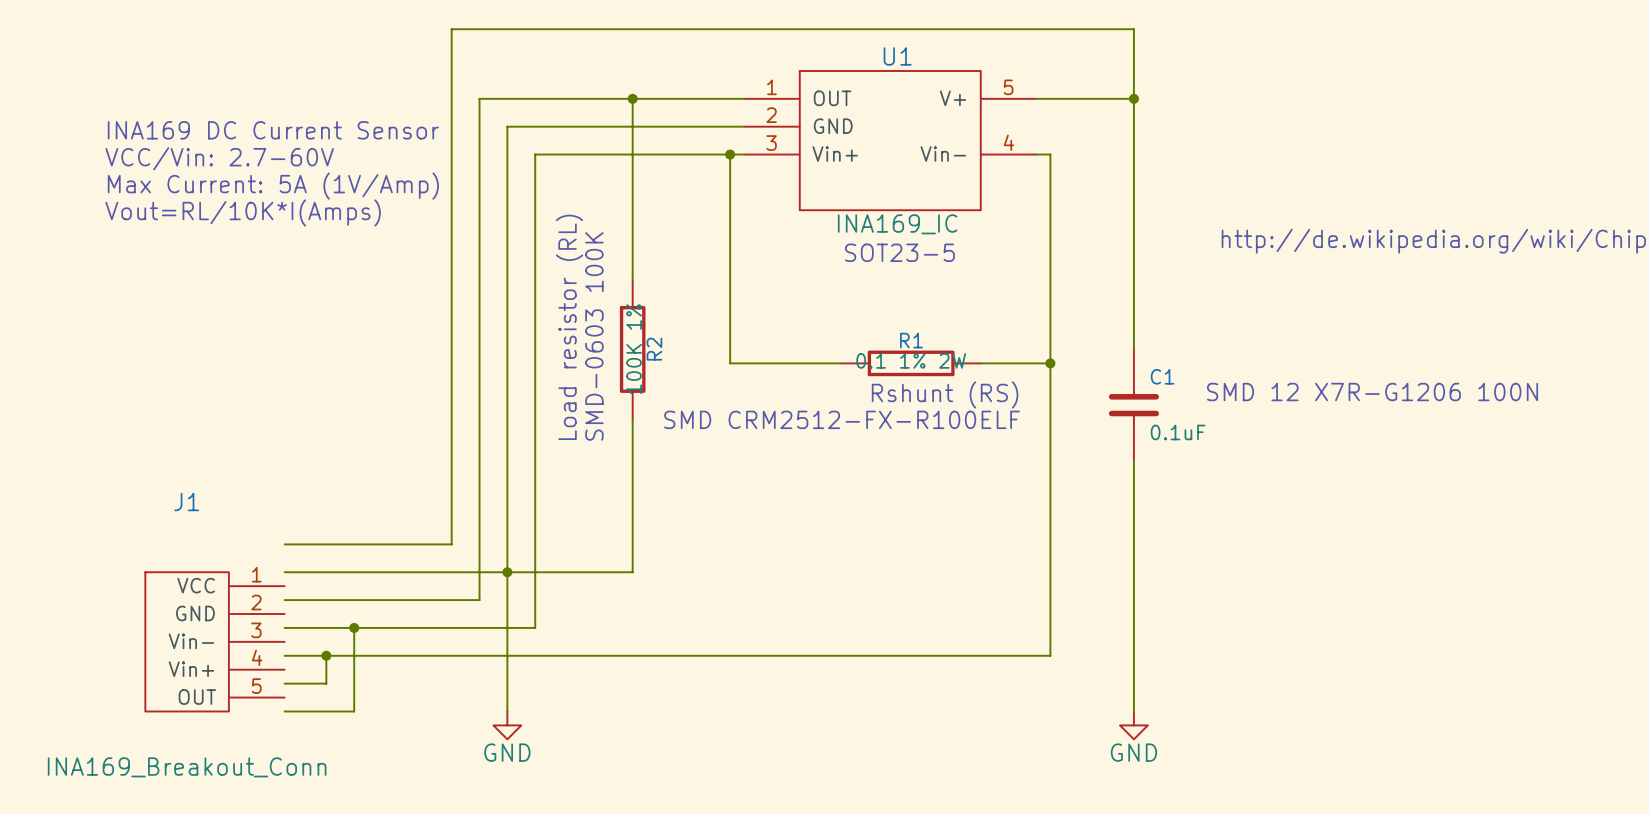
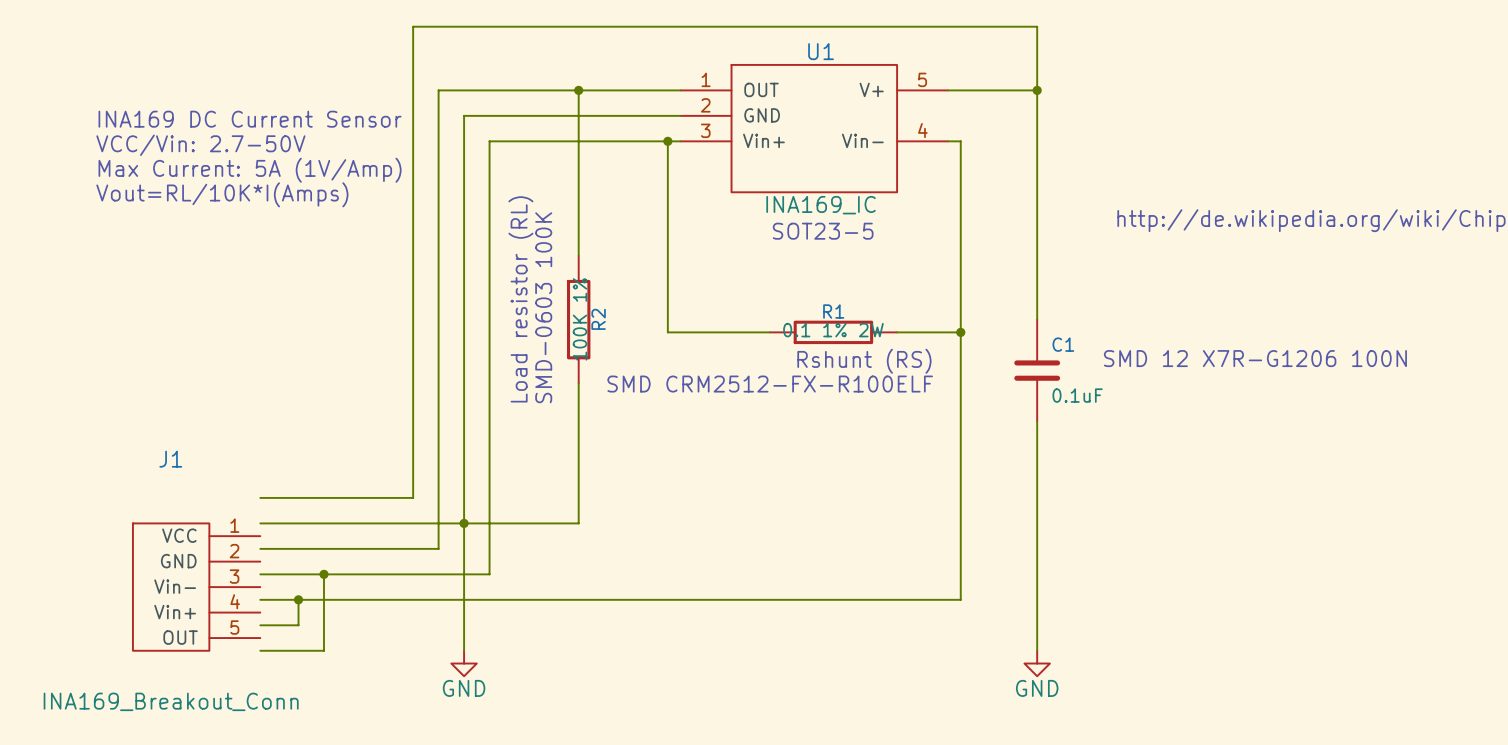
text: VCC/Vin: 2.7-60V (219, 158) -> VCC/Vin: 2.7-50V (200, 145)

